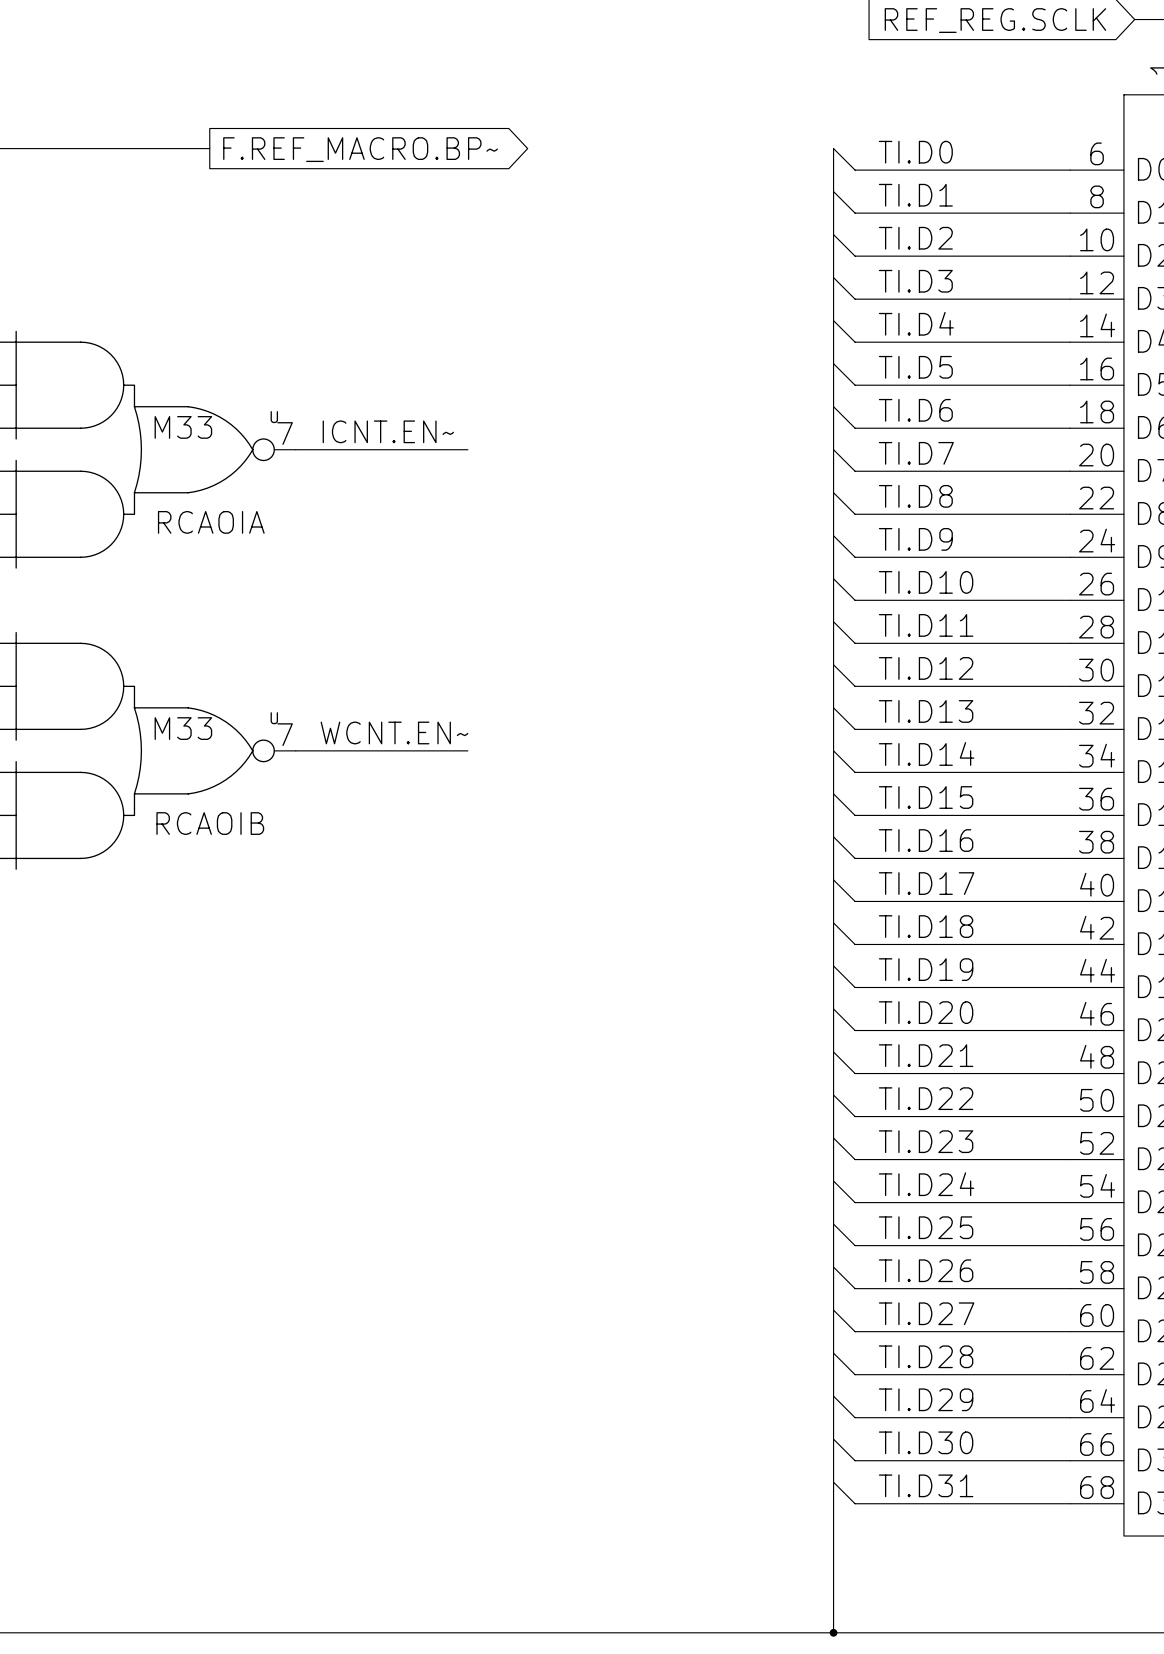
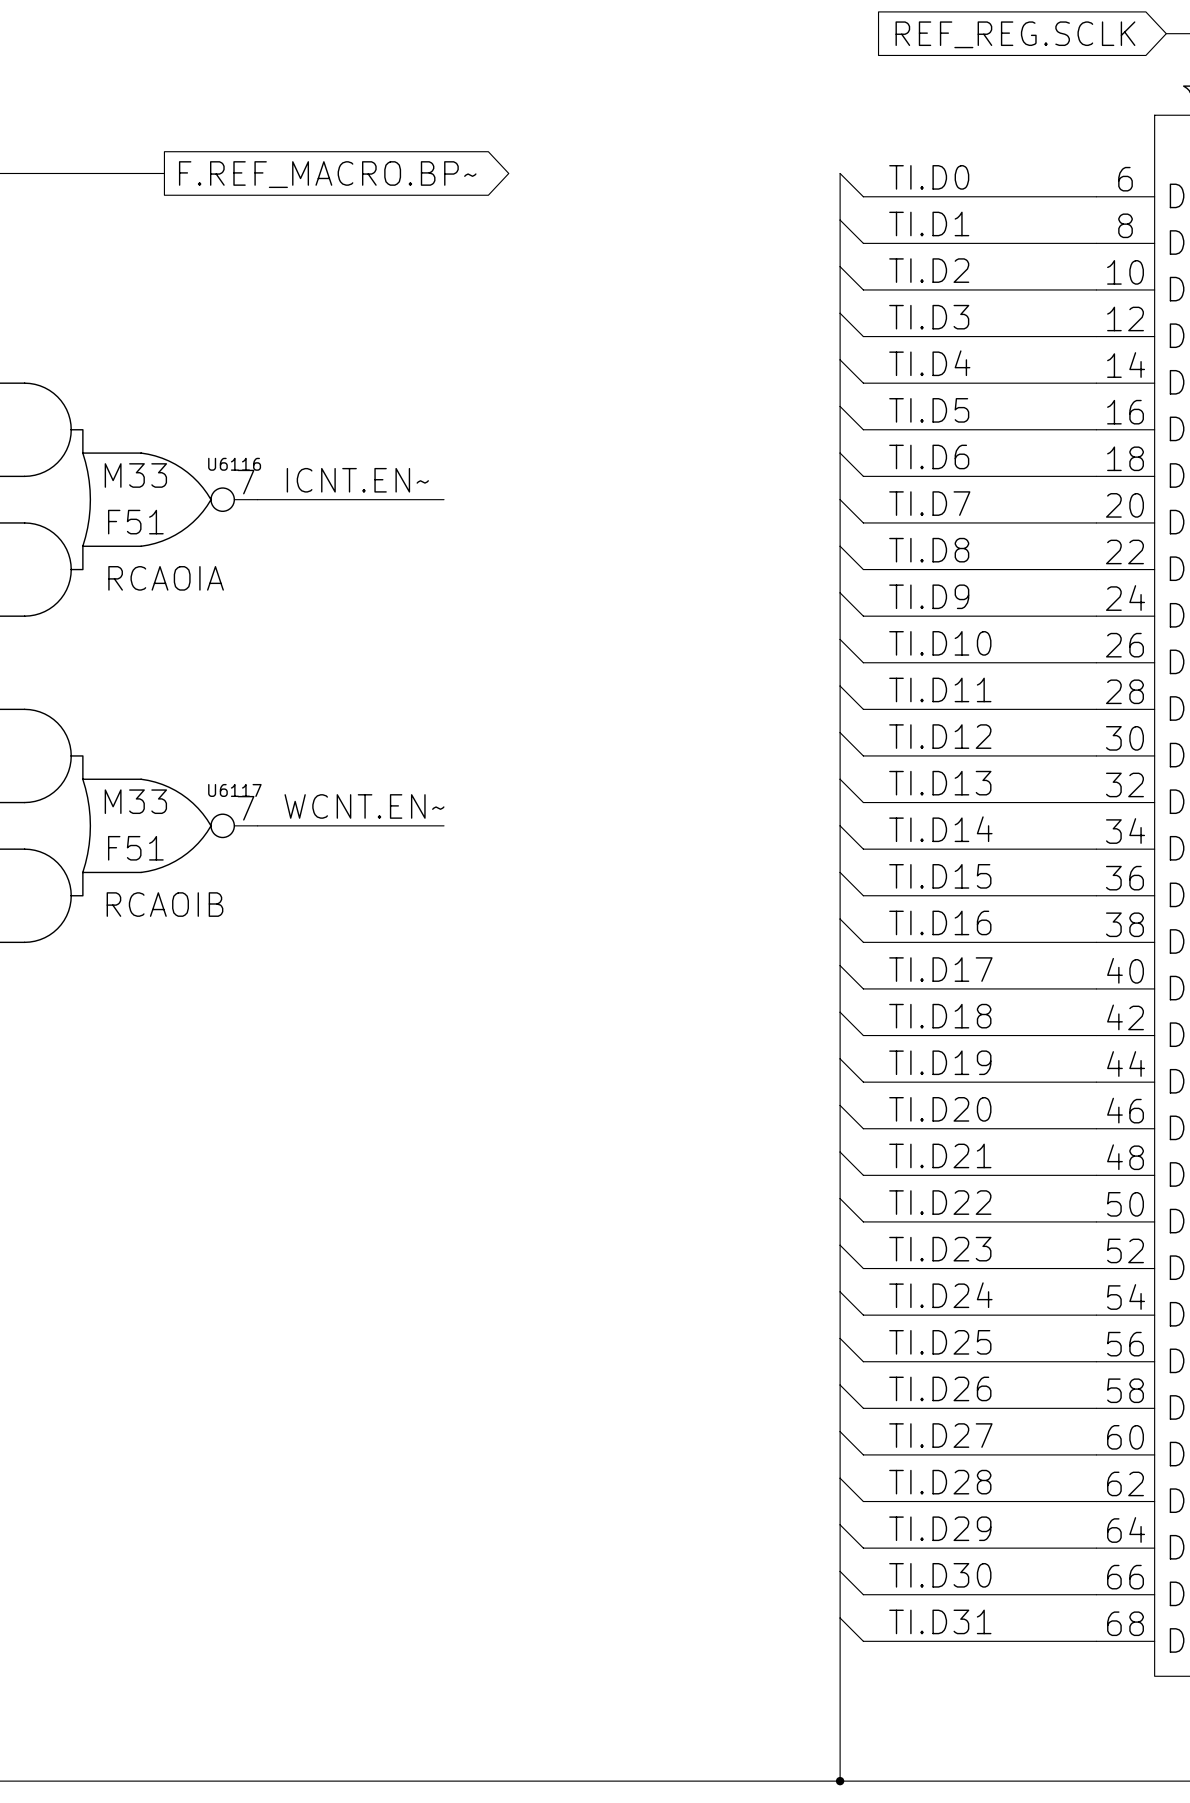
U name: U (274, 417) -> U6116 (234, 464)
U value: none -> F51 (135, 522)
U name: U (274, 718) -> U6117 (234, 790)
U value: none -> F51 (135, 848)

